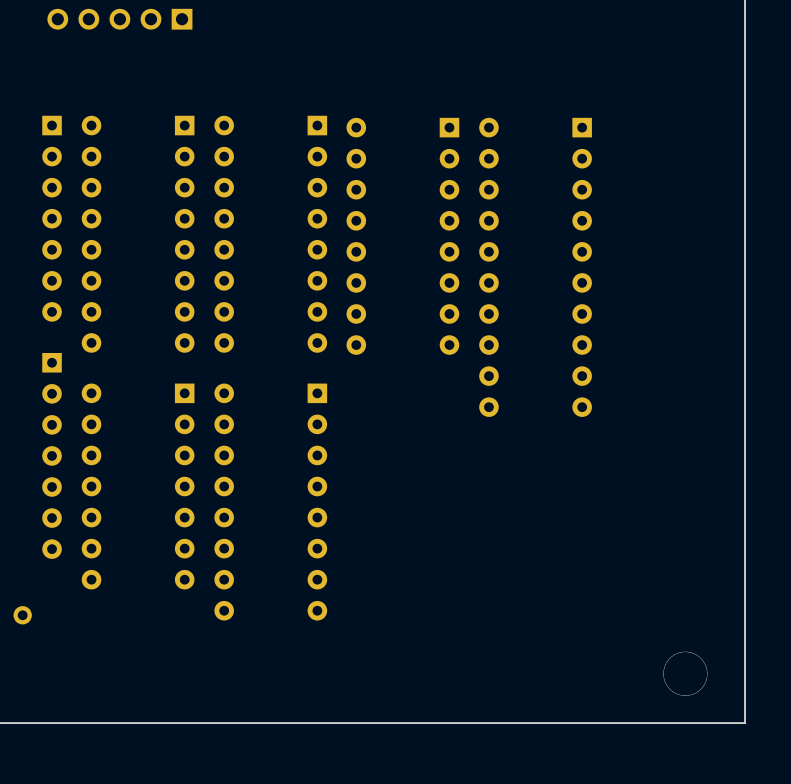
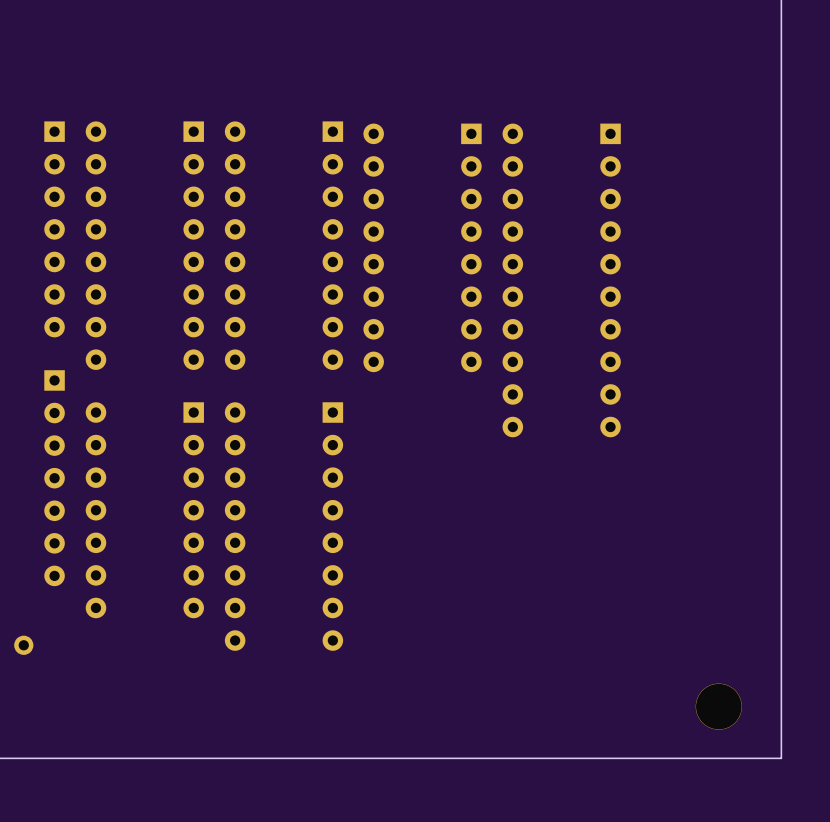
part: (119, 19) -> none

